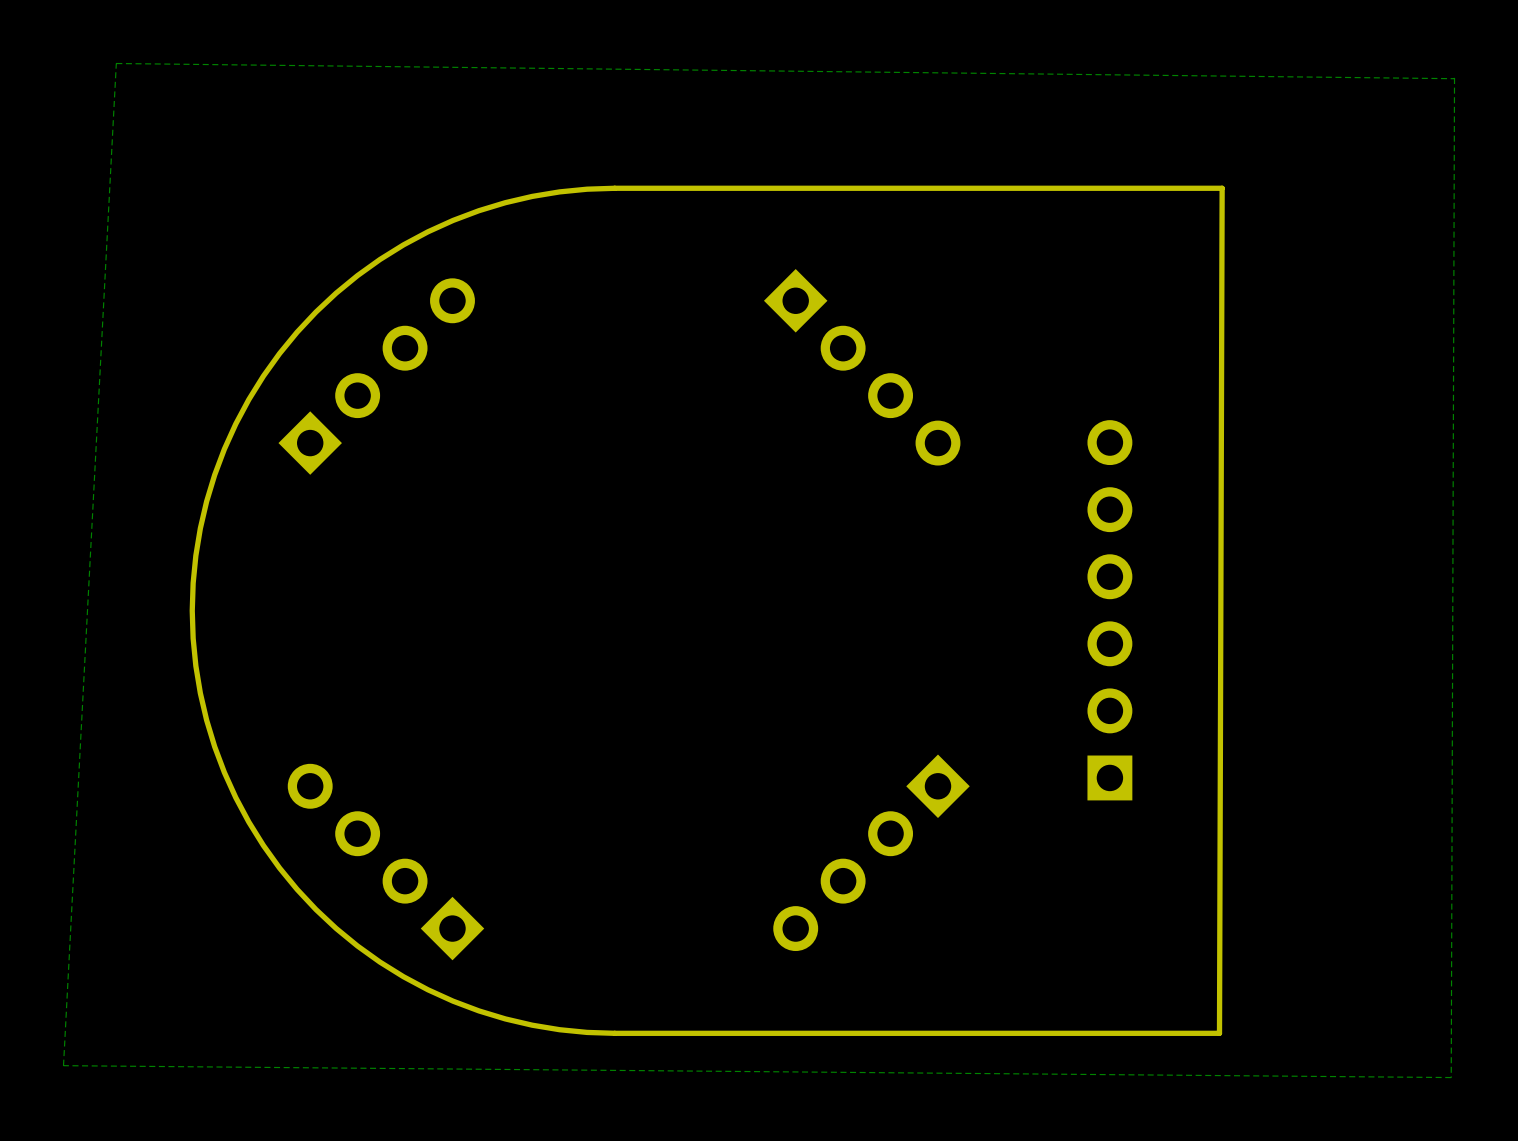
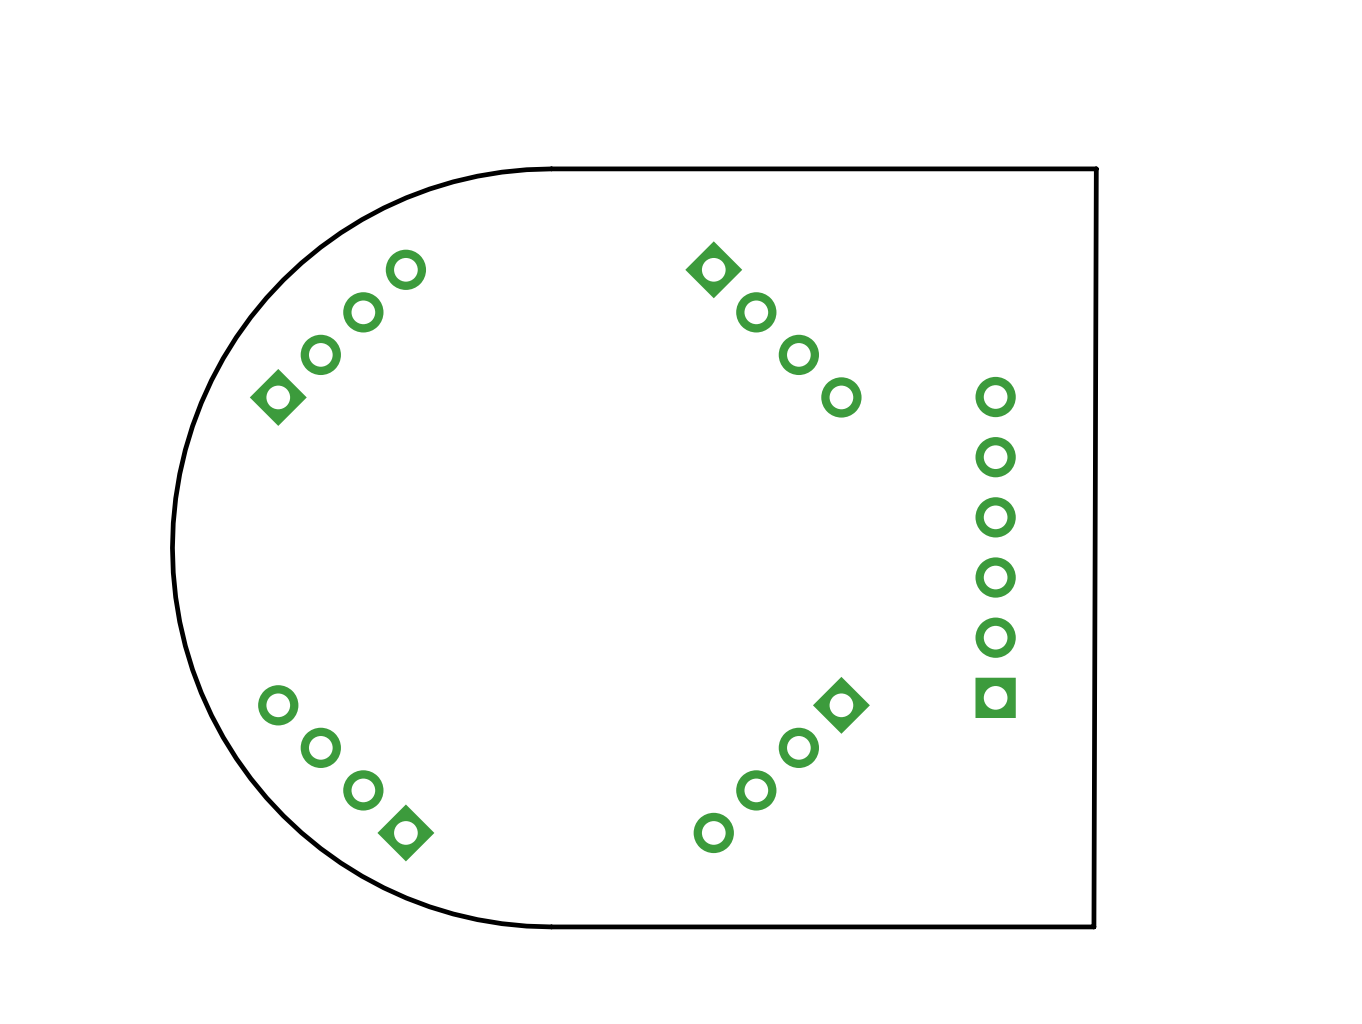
zone outline: (116, 63) (63, 1065) (1451, 1077) (1454, 78) (116, 63) -> none

